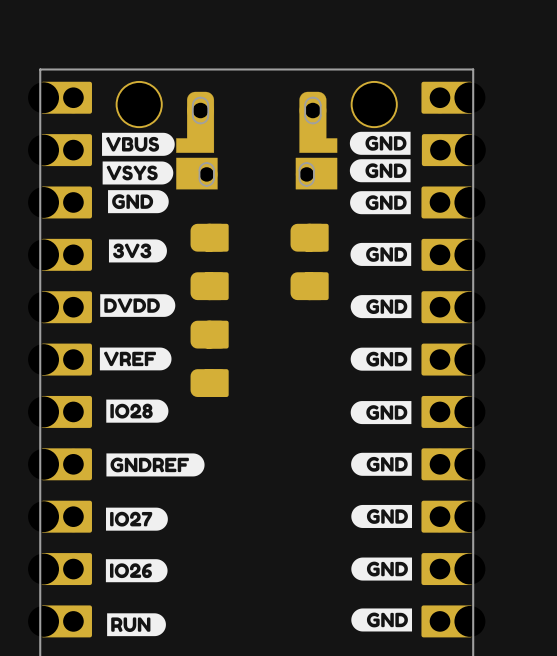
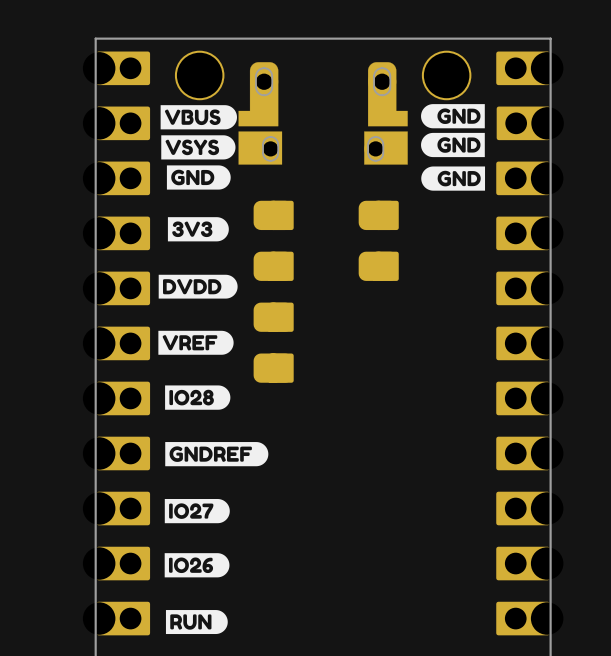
drawing: [350, 242, 412, 266] -> none
drawing: [350, 295, 412, 319] -> none
drawing: [350, 347, 412, 371] -> none
drawing: [350, 401, 412, 425] -> none
drawing: [351, 452, 412, 476] -> none
drawing: [351, 504, 413, 528] -> none
drawing: [351, 557, 413, 581] -> none
drawing: [351, 608, 413, 632] -> none

